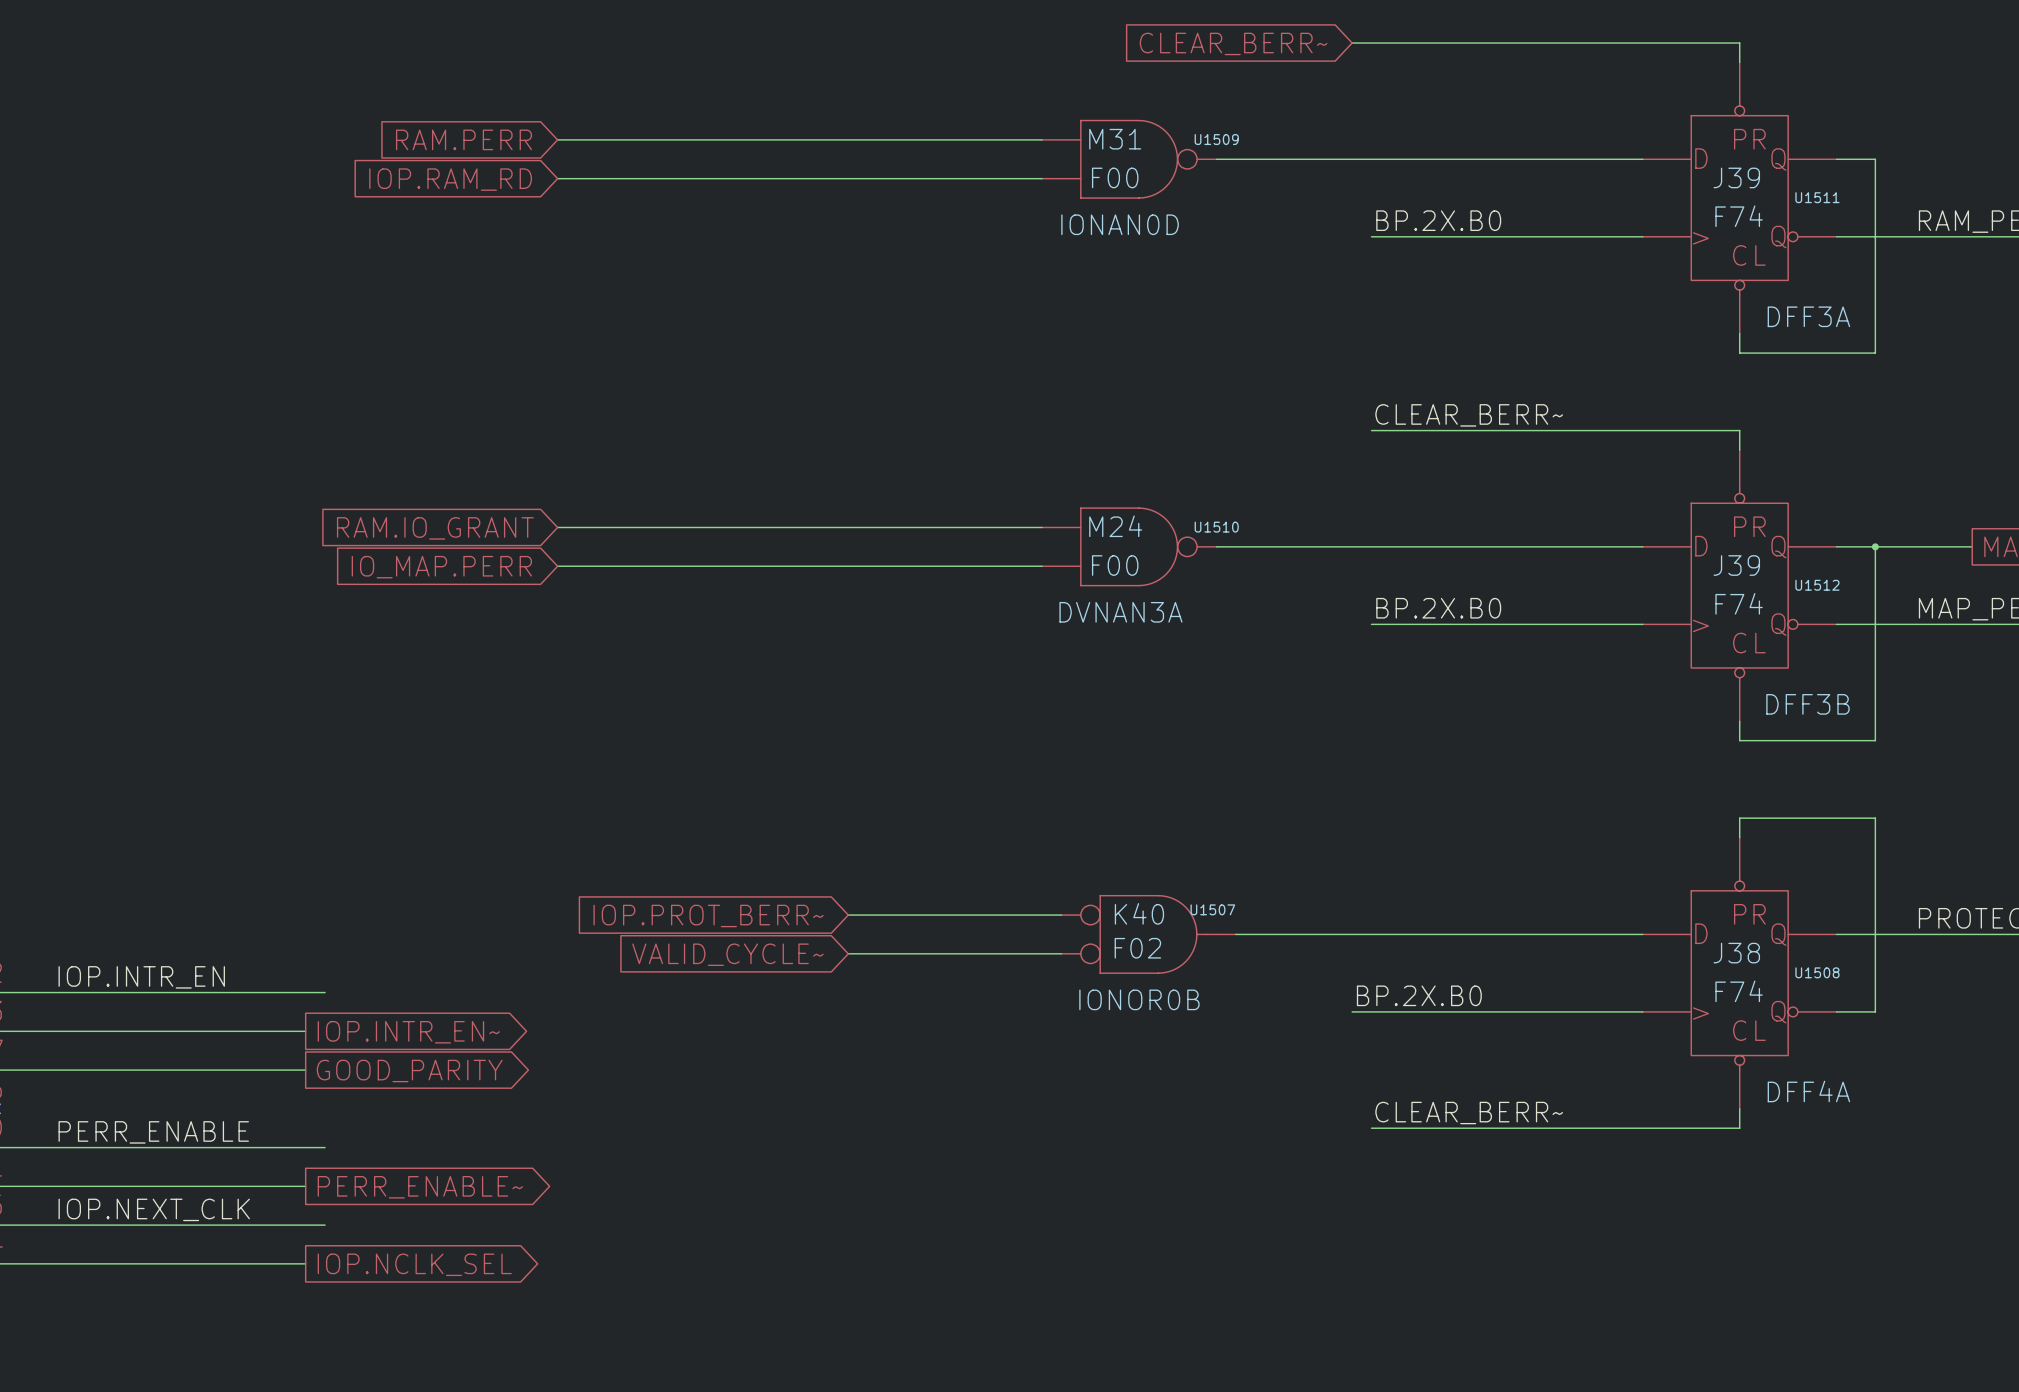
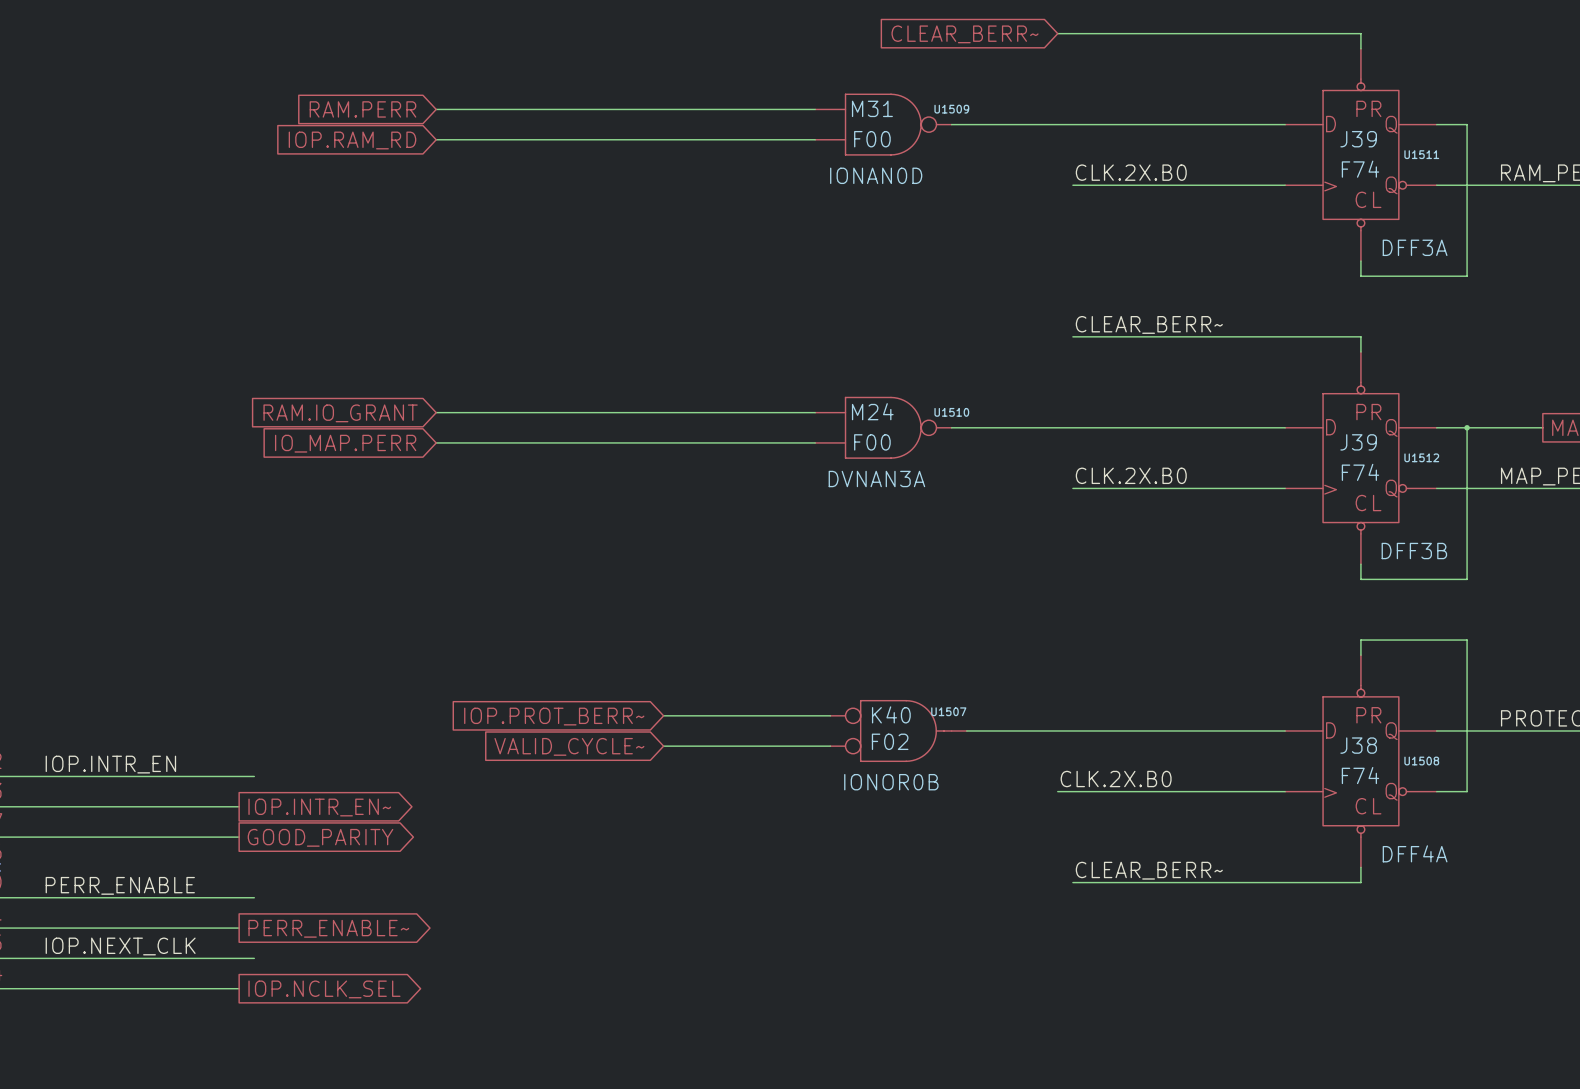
label: BP.2X.B0 (1438, 220) -> CLK.2X.B0 (1131, 172)
label: BP.2X.B0 (1438, 608) -> CLK.2X.B0 (1131, 475)
label: BP.2X.B0 (1419, 995) -> CLK.2X.B0 (1116, 779)

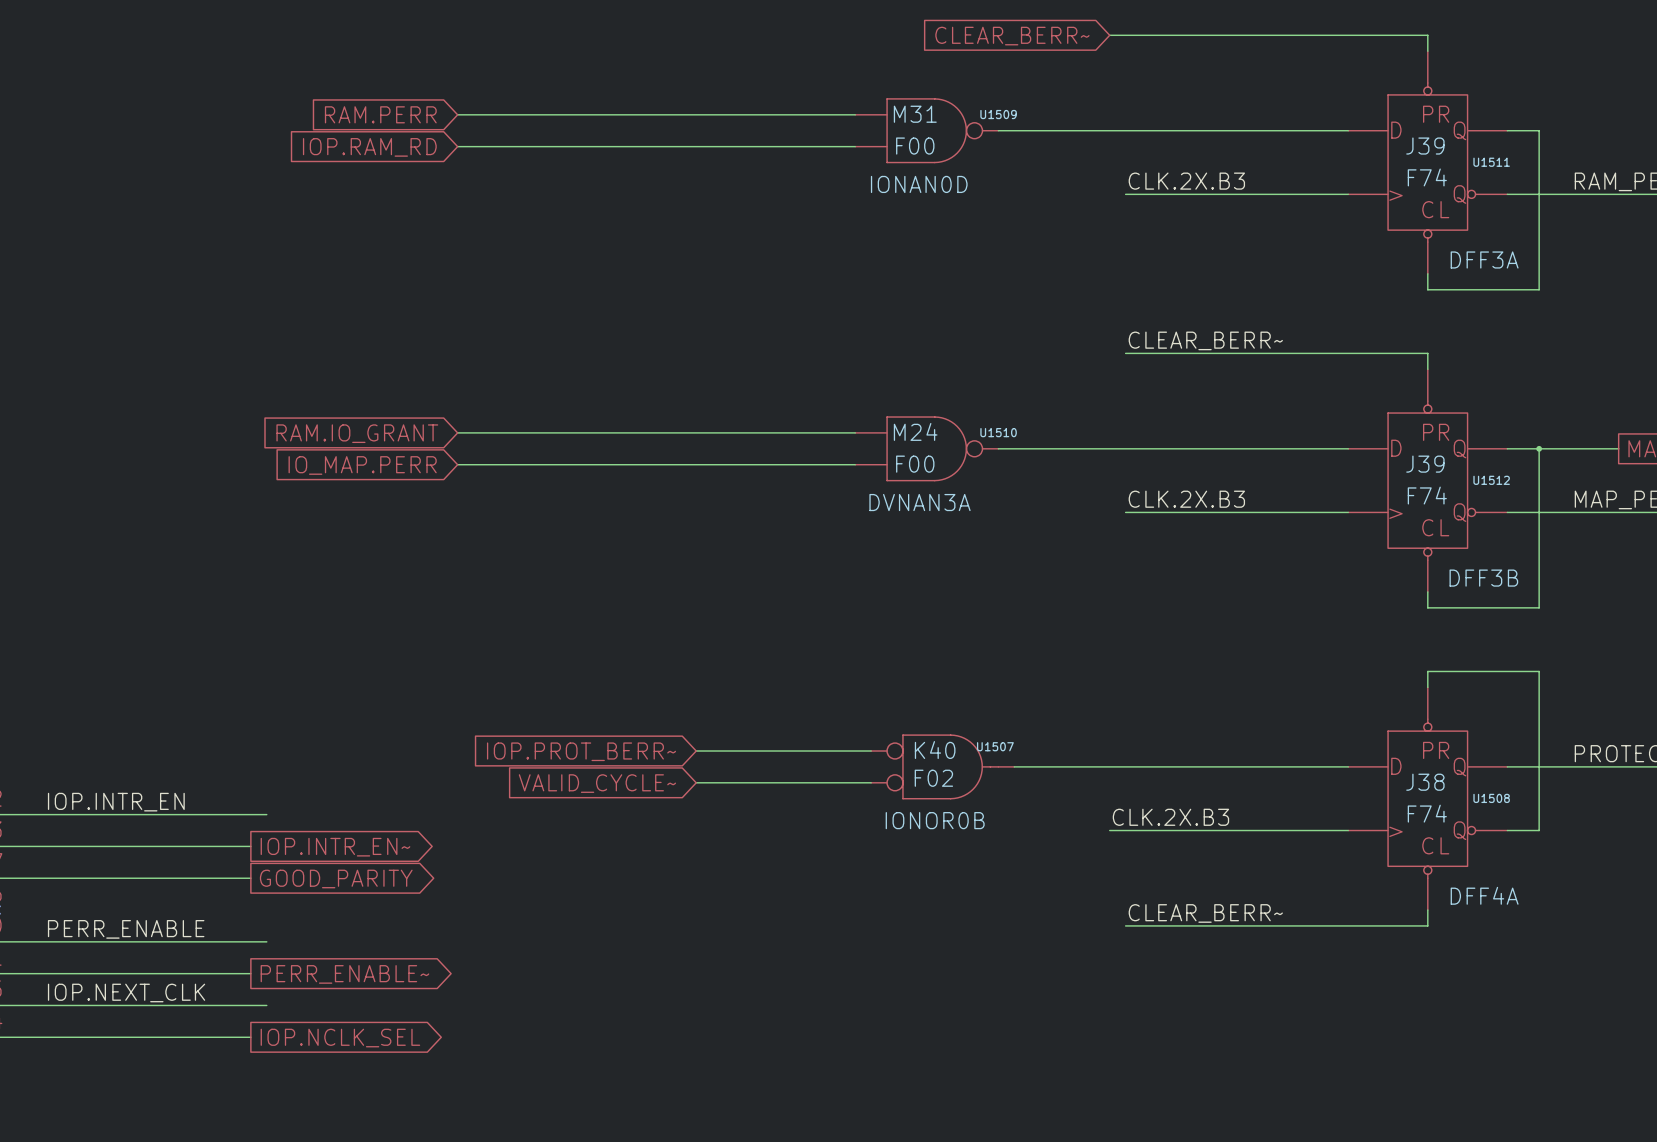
label: CLK.2X.B0 (1131, 172) -> CLK.2X.B3 (1186, 181)
label: CLK.2X.B0 (1131, 475) -> CLK.2X.B3 (1186, 499)
label: CLK.2X.B0 (1116, 779) -> CLK.2X.B3 (1170, 817)

